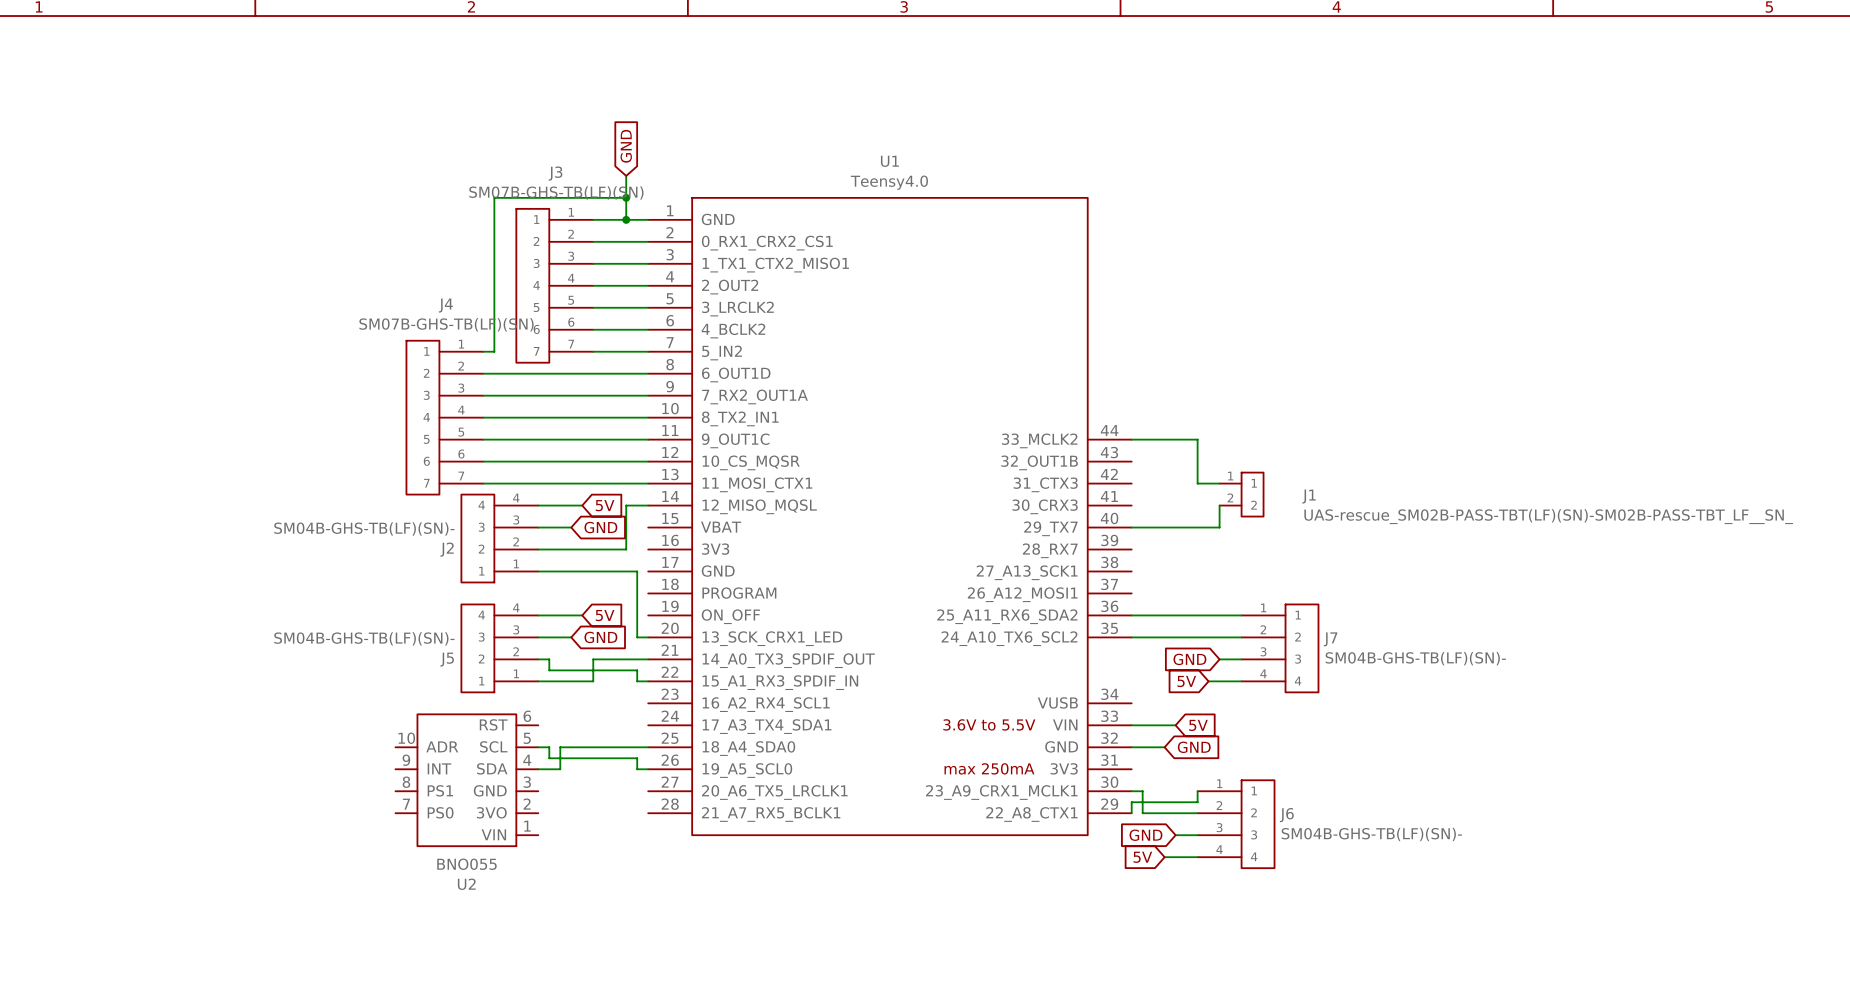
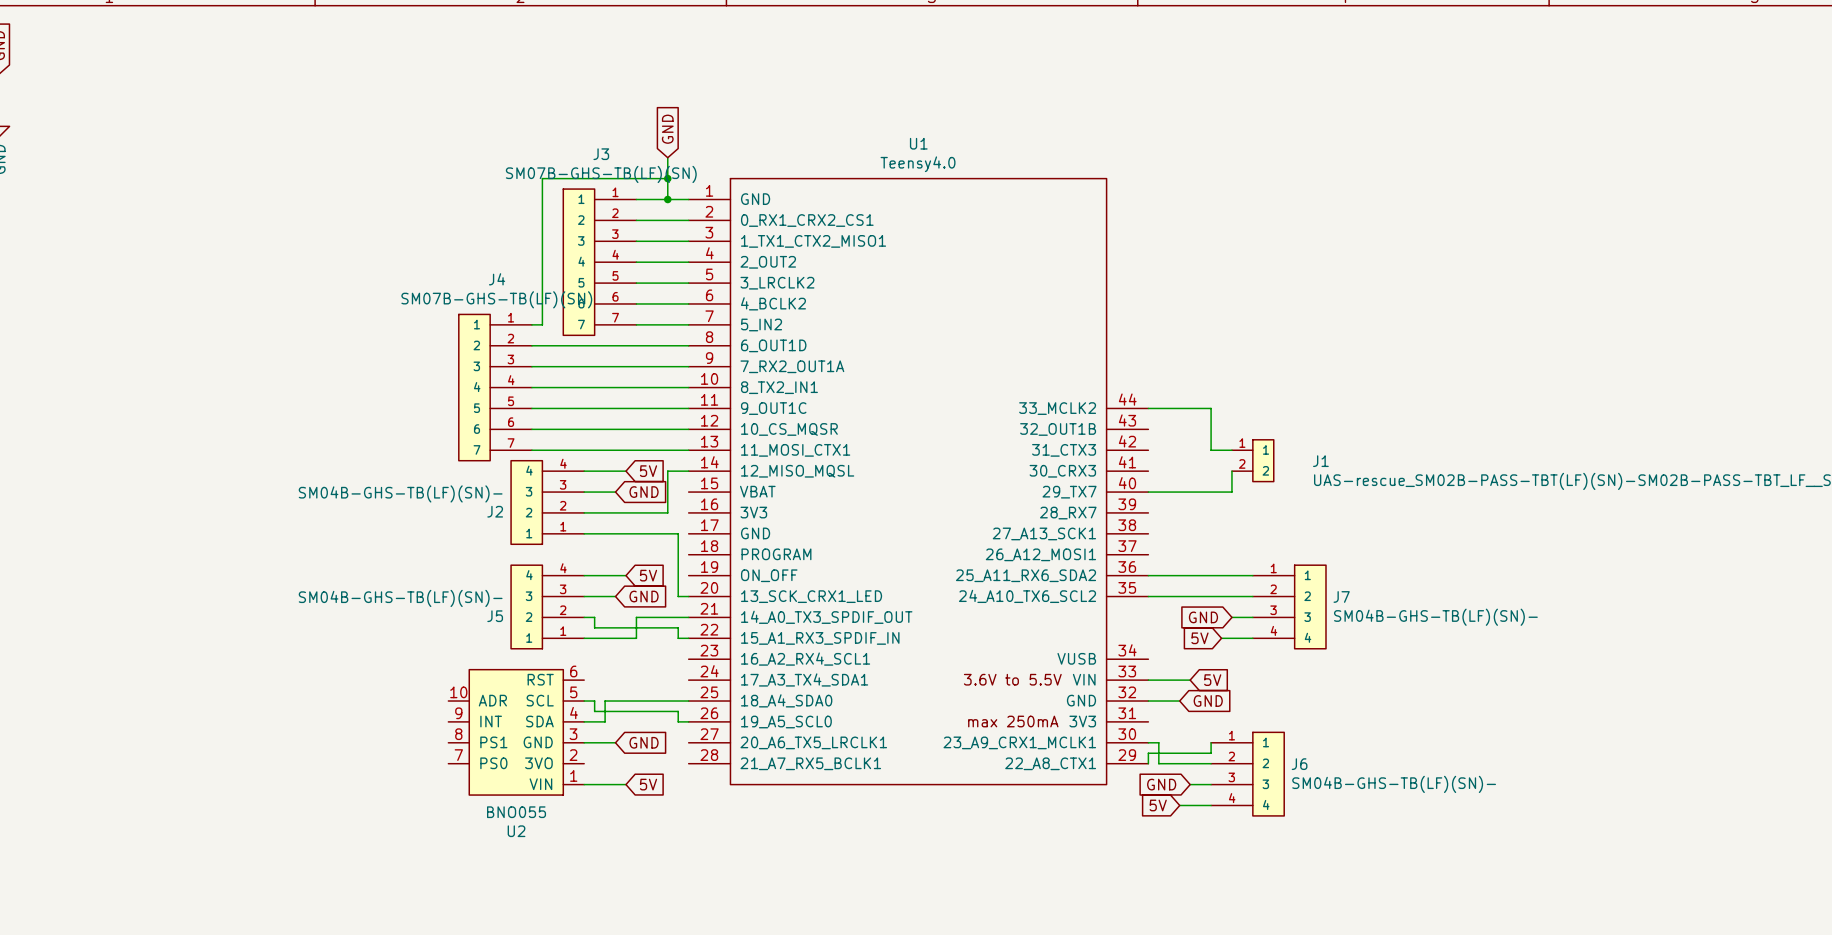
wire: none -> (584, 742) (615, 742)
global label: none -> GND (644, 742)
wire: none -> (584, 784) (625, 784)
global label: none -> 5V (648, 784)

